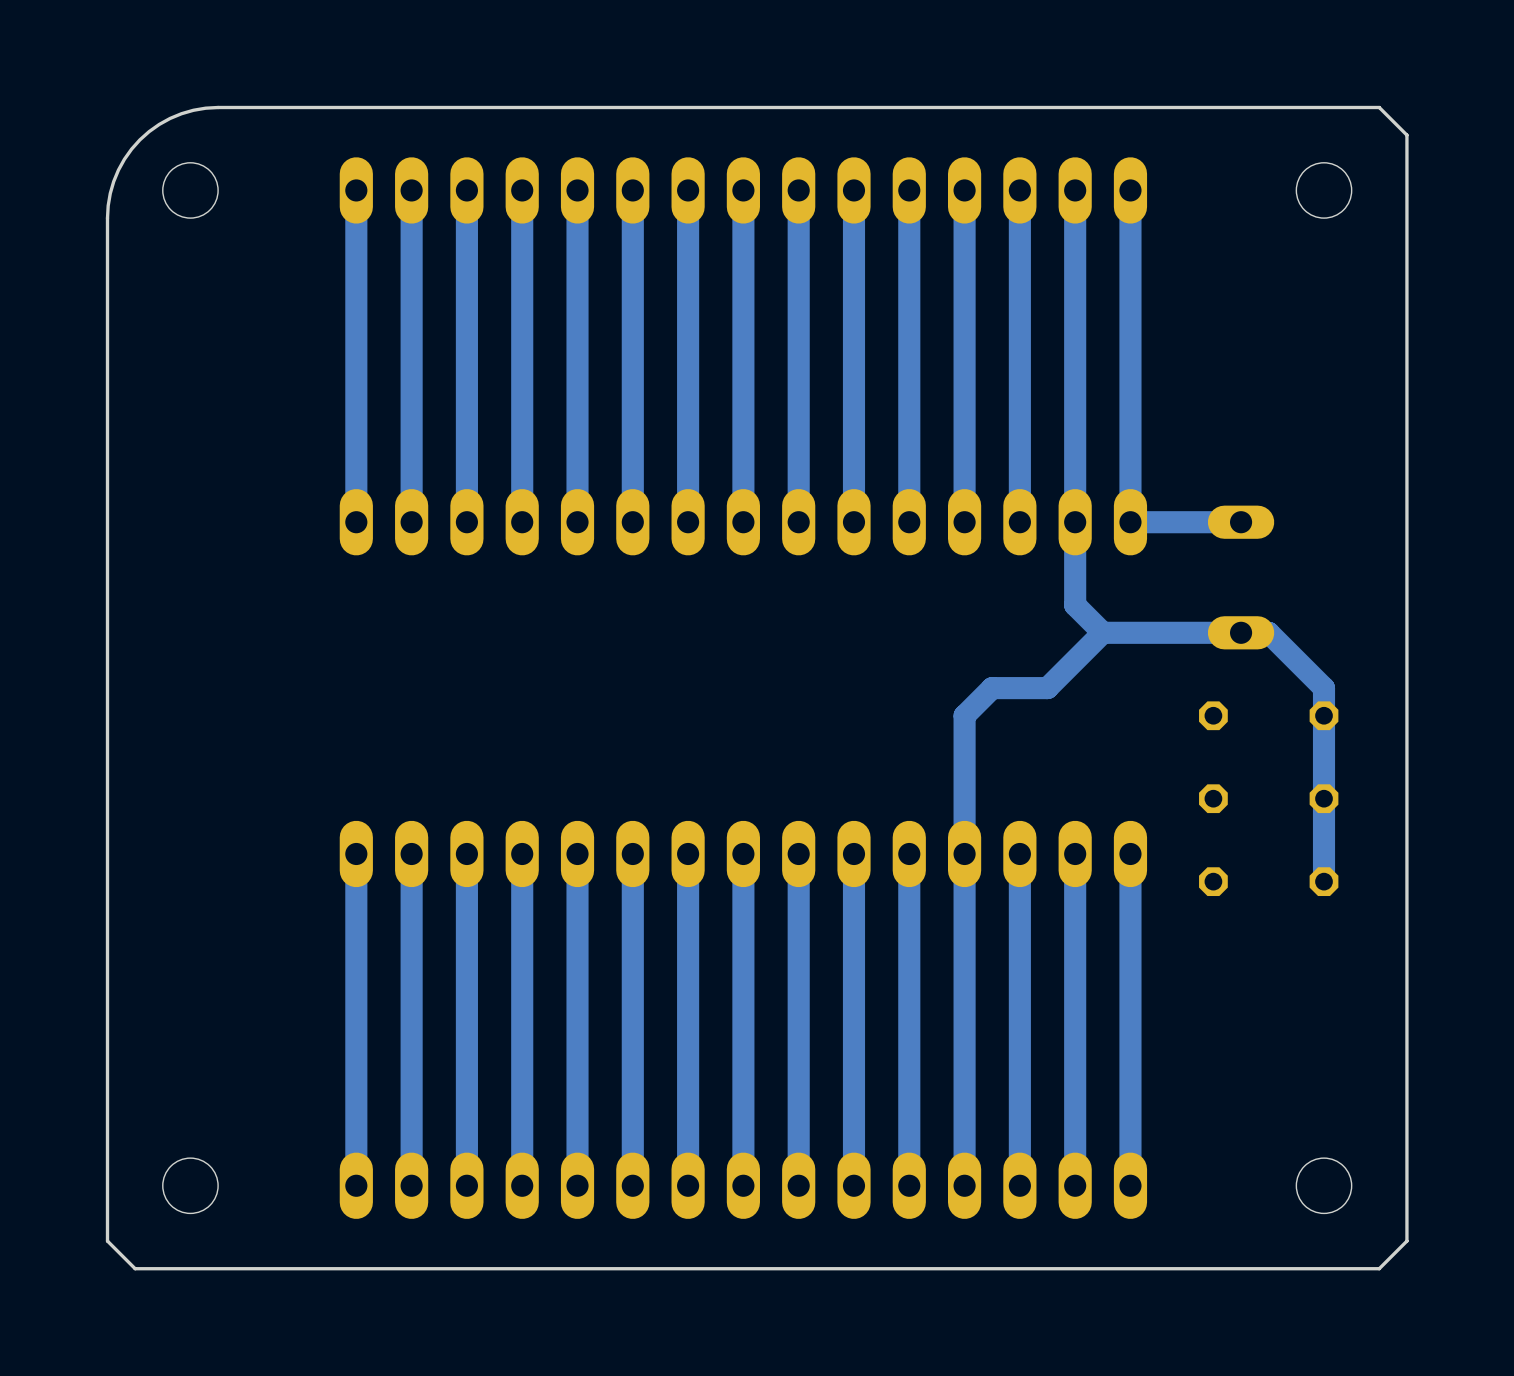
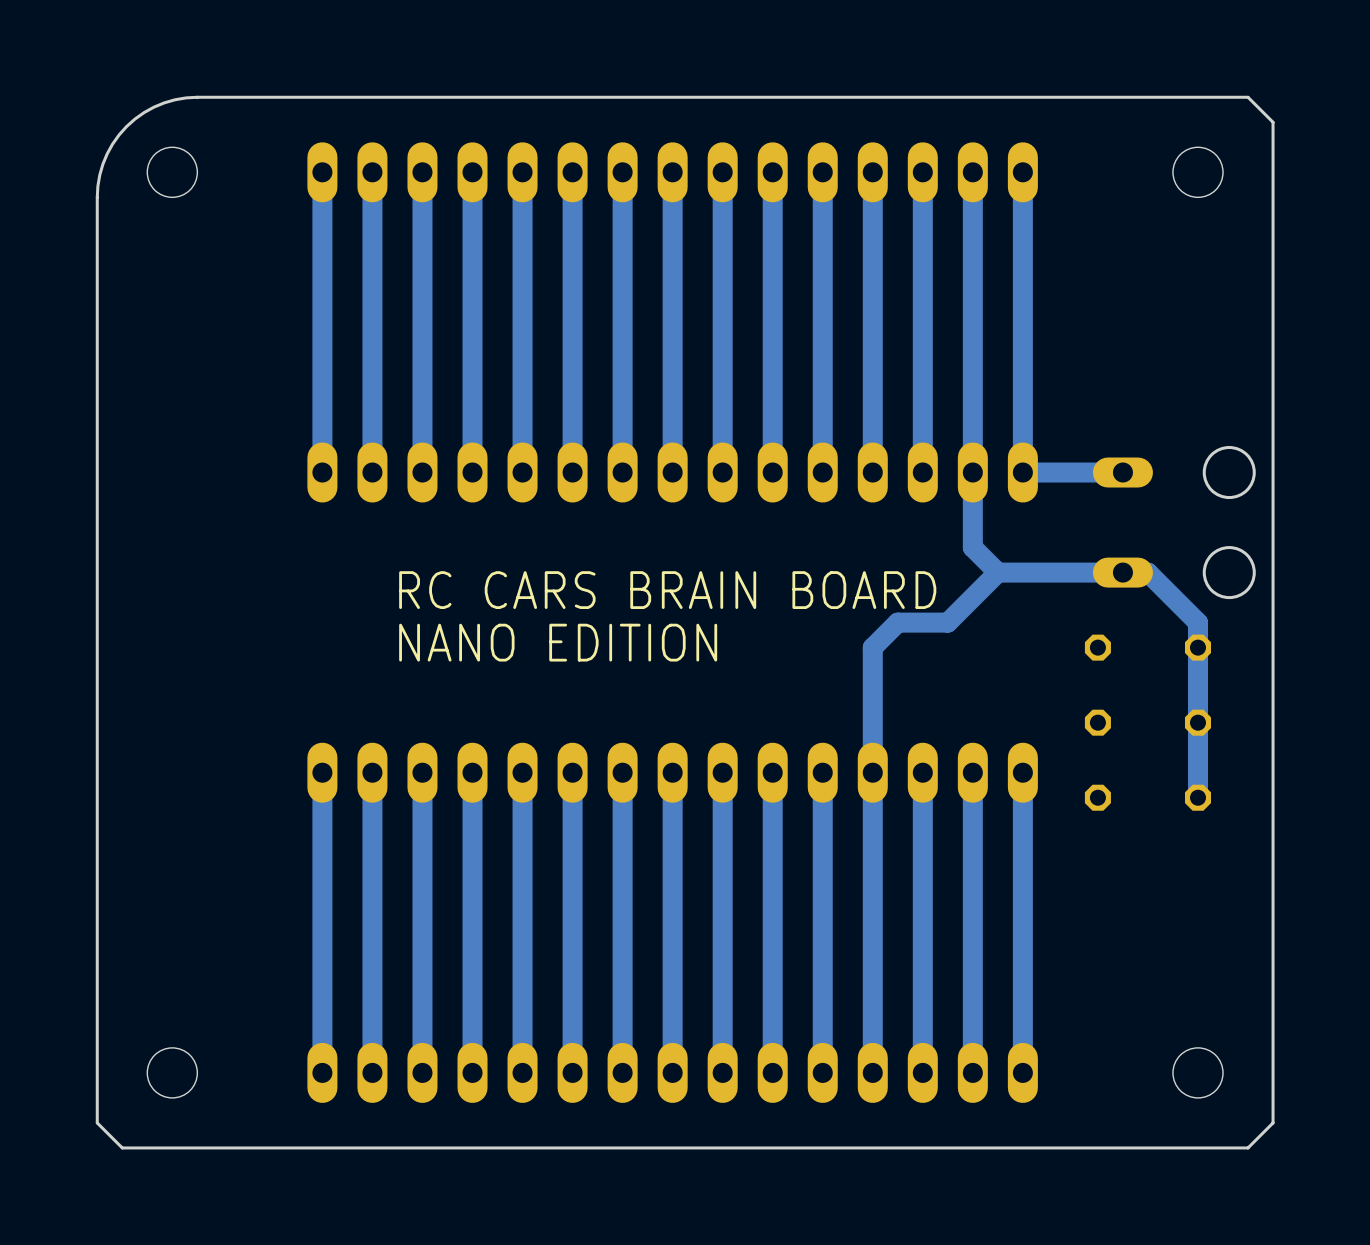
round board edge: none -> [1202, 446, 1256, 500]
round board edge: none -> [1202, 546, 1256, 600]
text: none -> RC CARS BRAIN BOARD (667, 590)
text: none -> NANO EDITION (558, 642)

